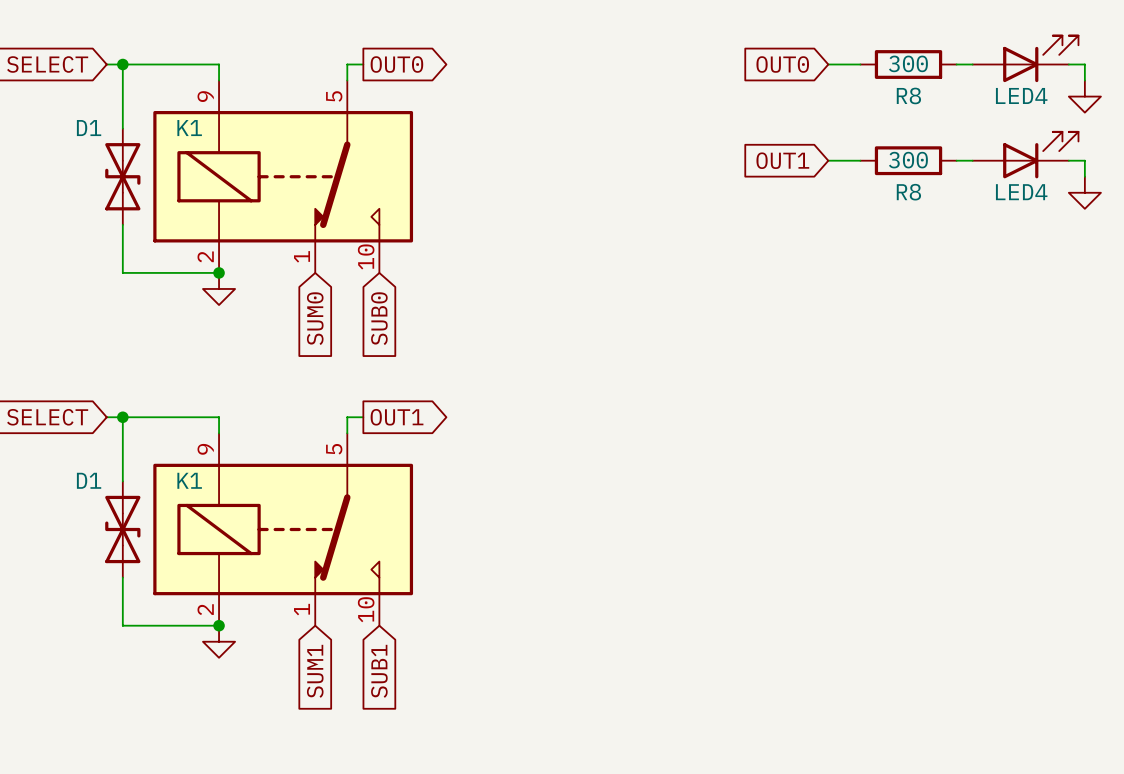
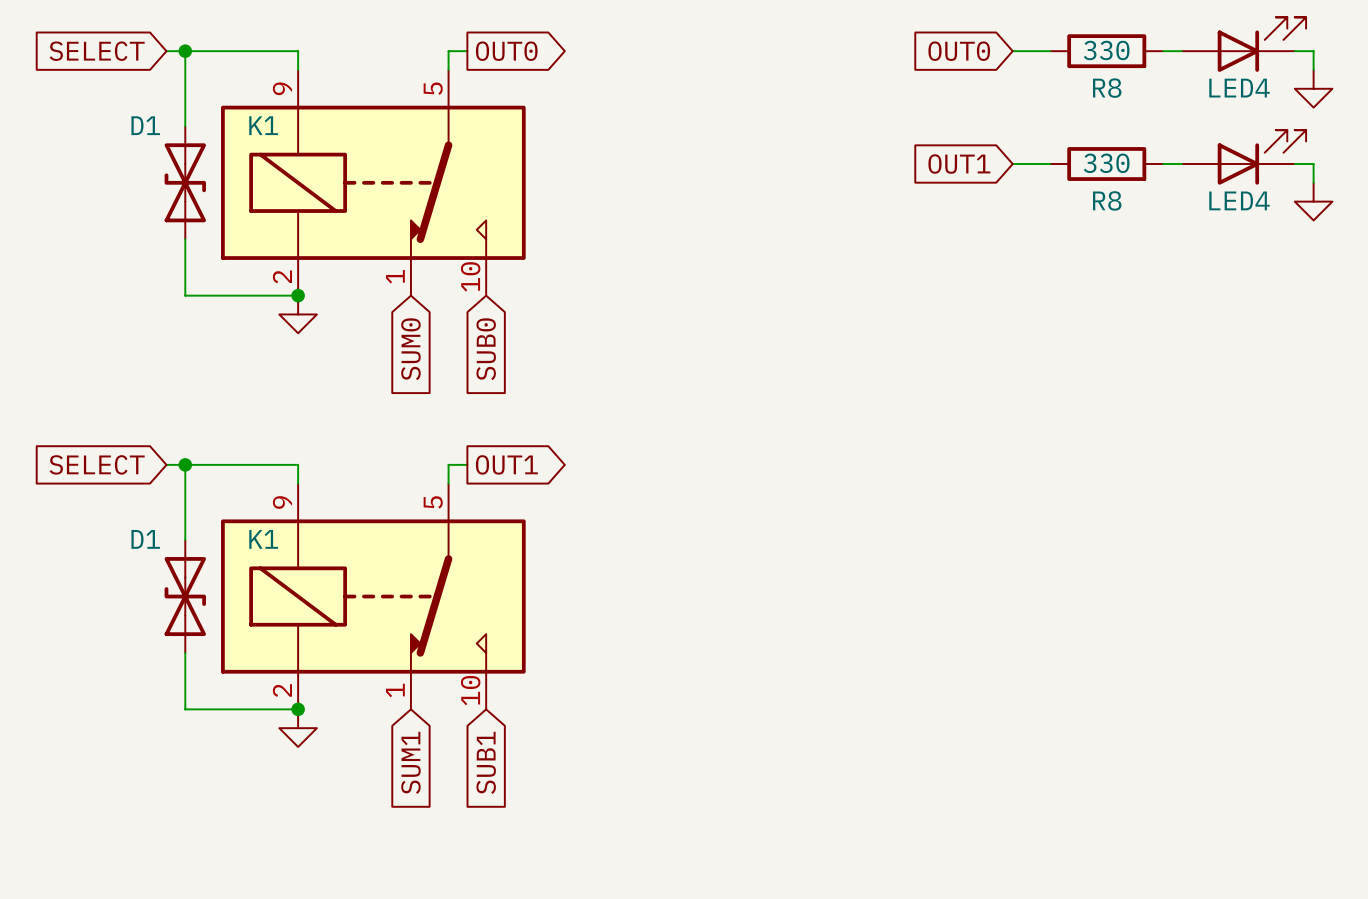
R8 value: 300 (908, 63) -> 330 (1106, 50)
R8 value: 300 (908, 160) -> 330 (1106, 163)

